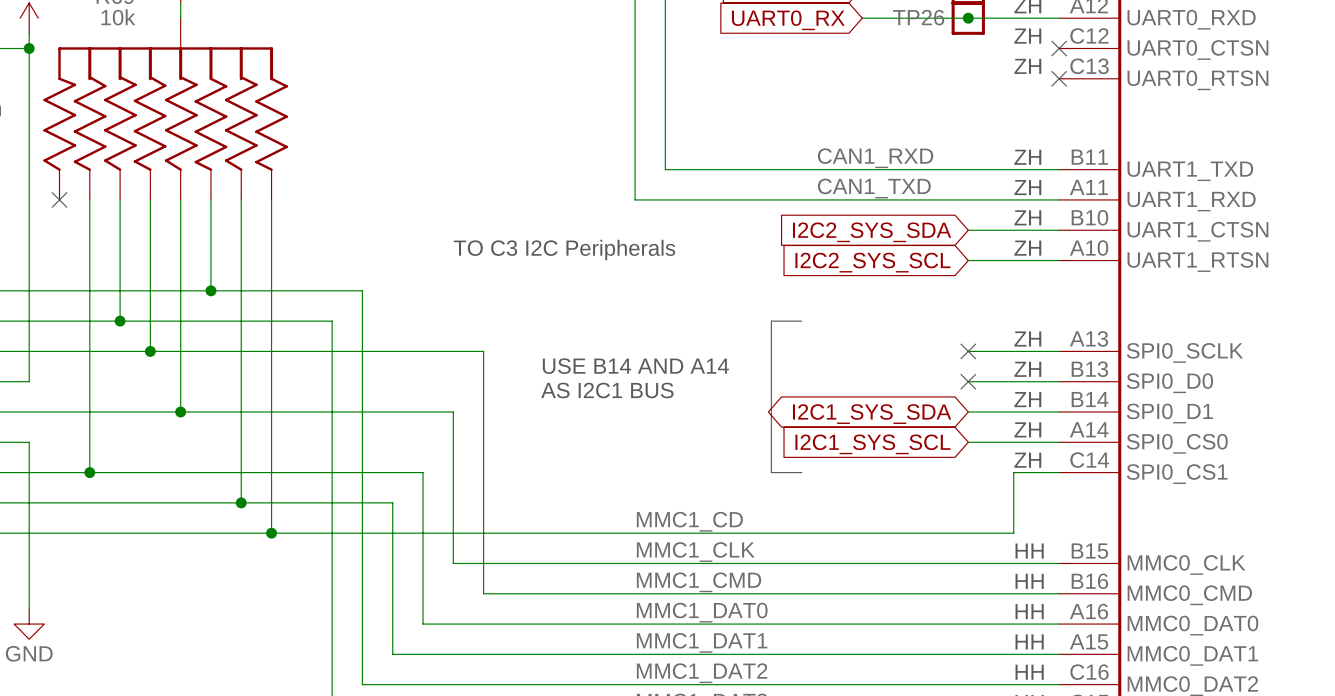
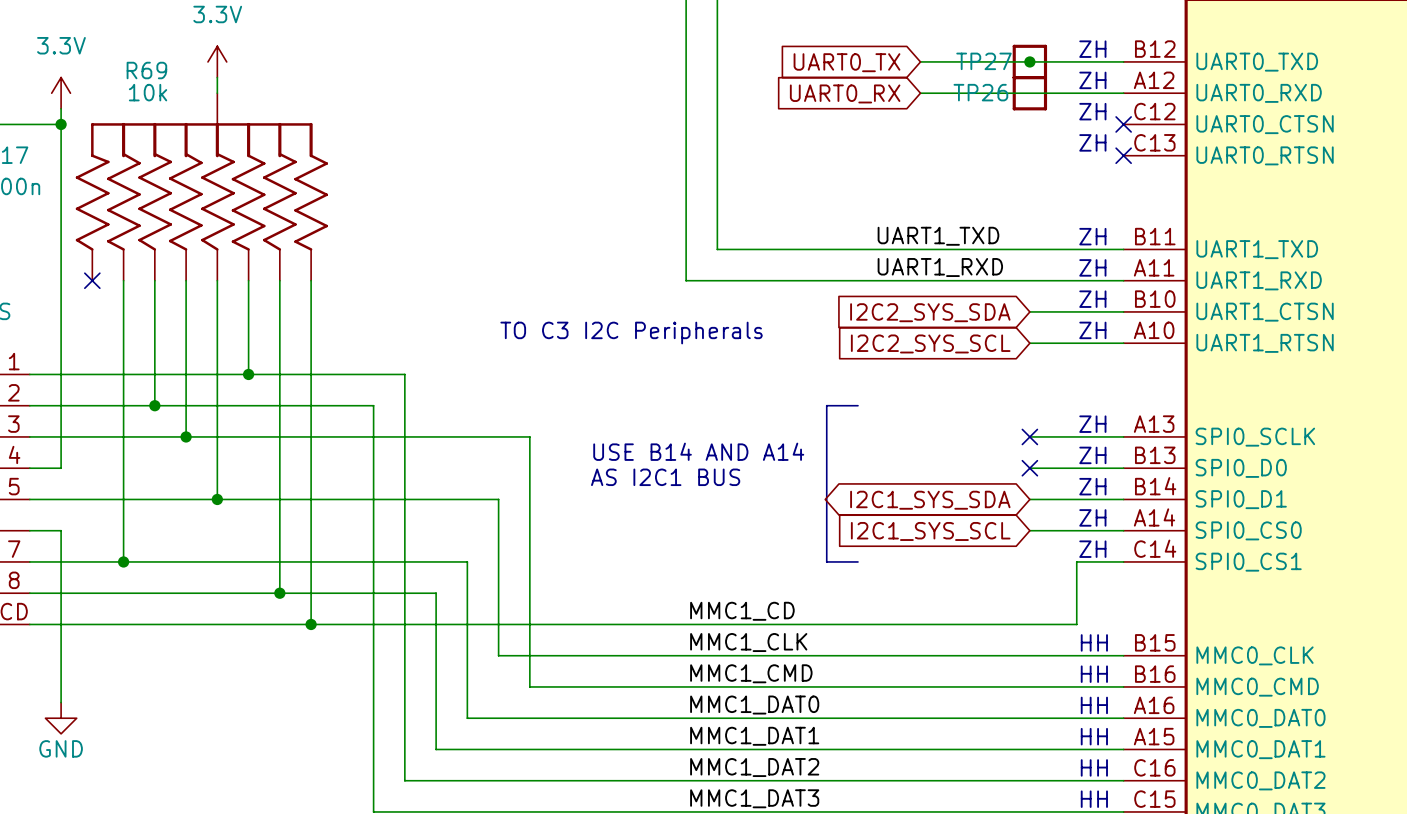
junction: (968, 18) -> none
label: CAN1_RXD (875, 158) -> UART1_TXD (938, 236)
label: CAN1_TXD (874, 188) -> UART1_RXD (940, 267)

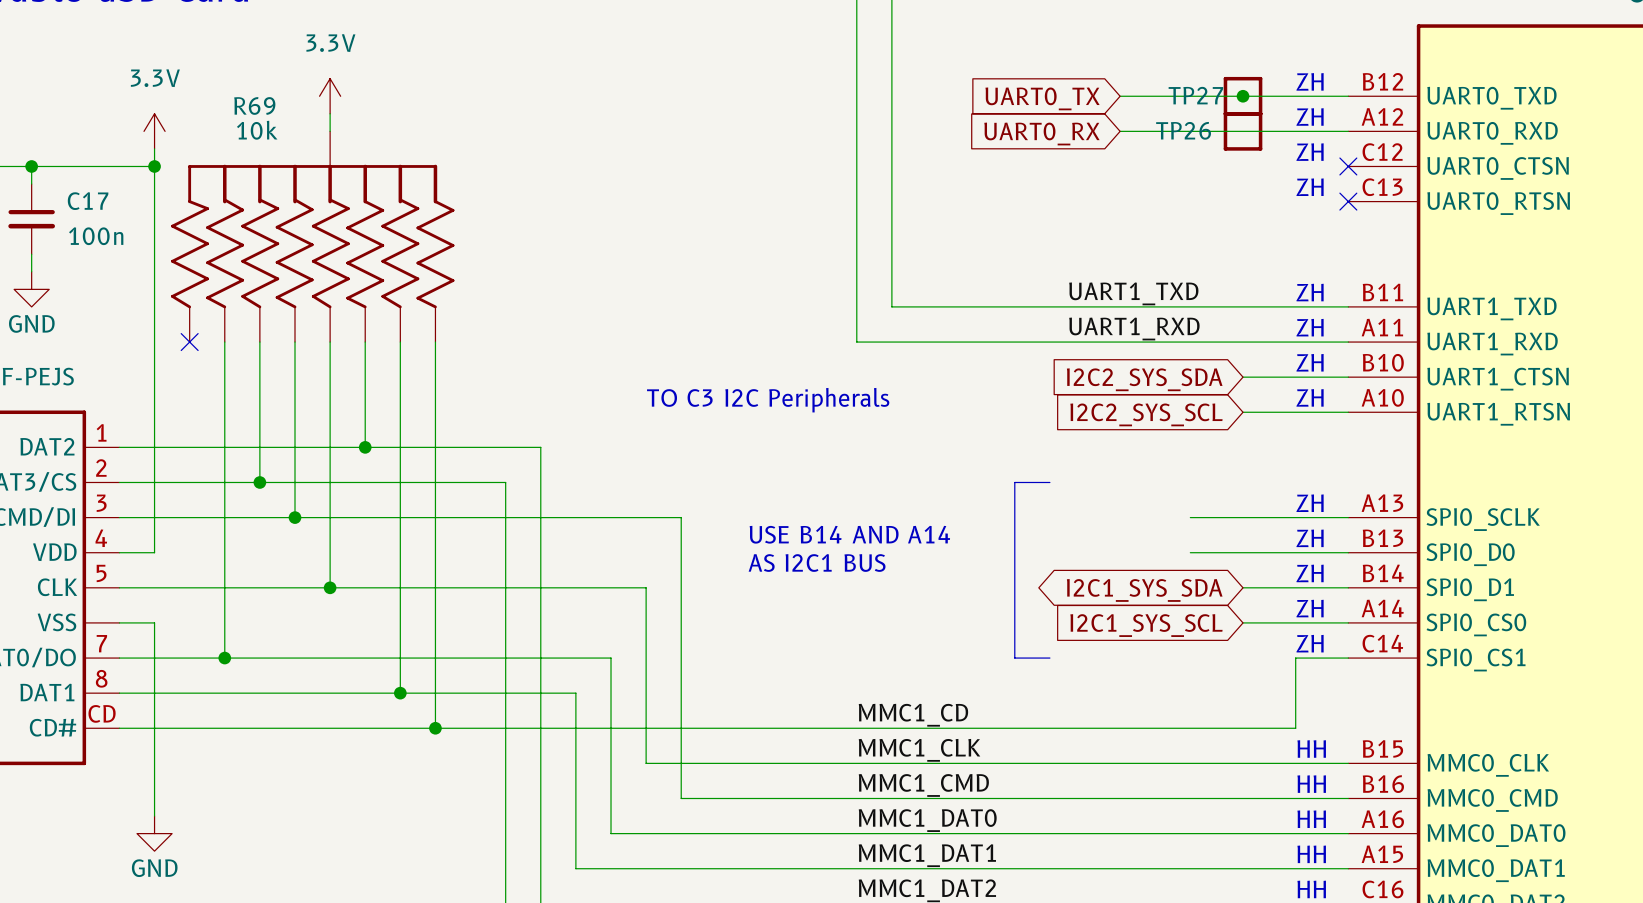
wire: none -> (1190, 517) (1243, 517)
no-connect mark: (1029, 436) -> none
wire: none -> (1190, 552) (1243, 552)
no-connect mark: (1029, 468) -> none

